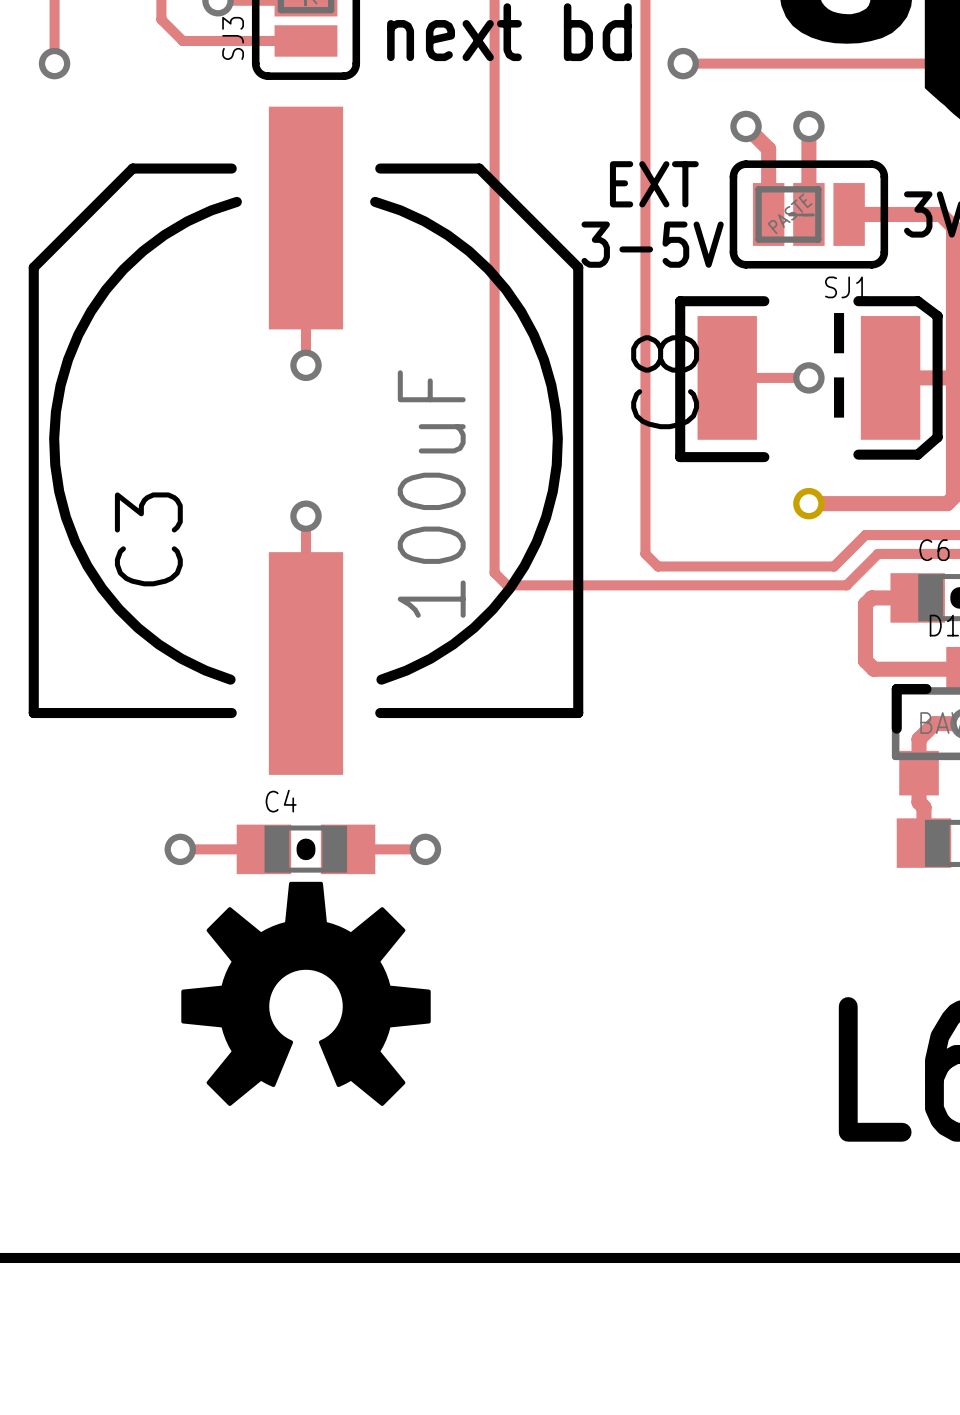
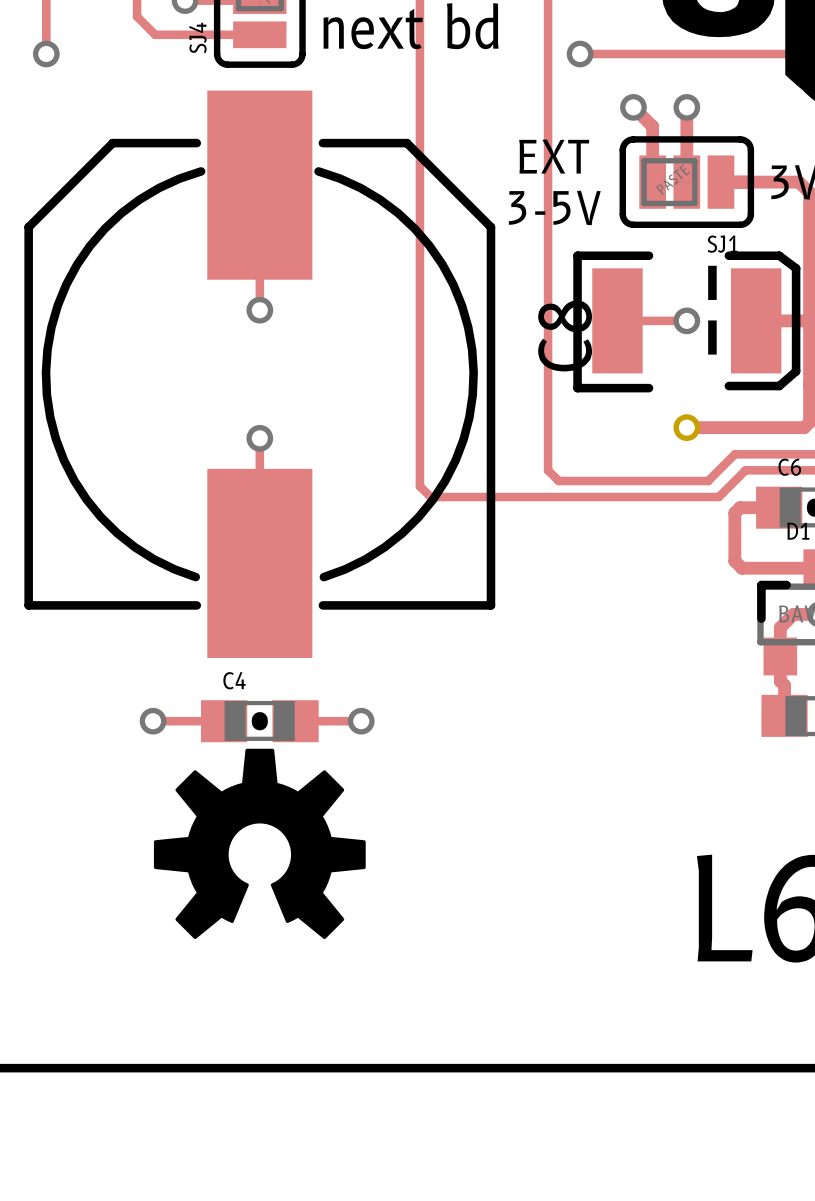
SJ3 name: SJ3 (233, 38) -> SJ4 (198, 37)
C3: 100uF (306, 440) -> none
part: none -> (259, 374)

